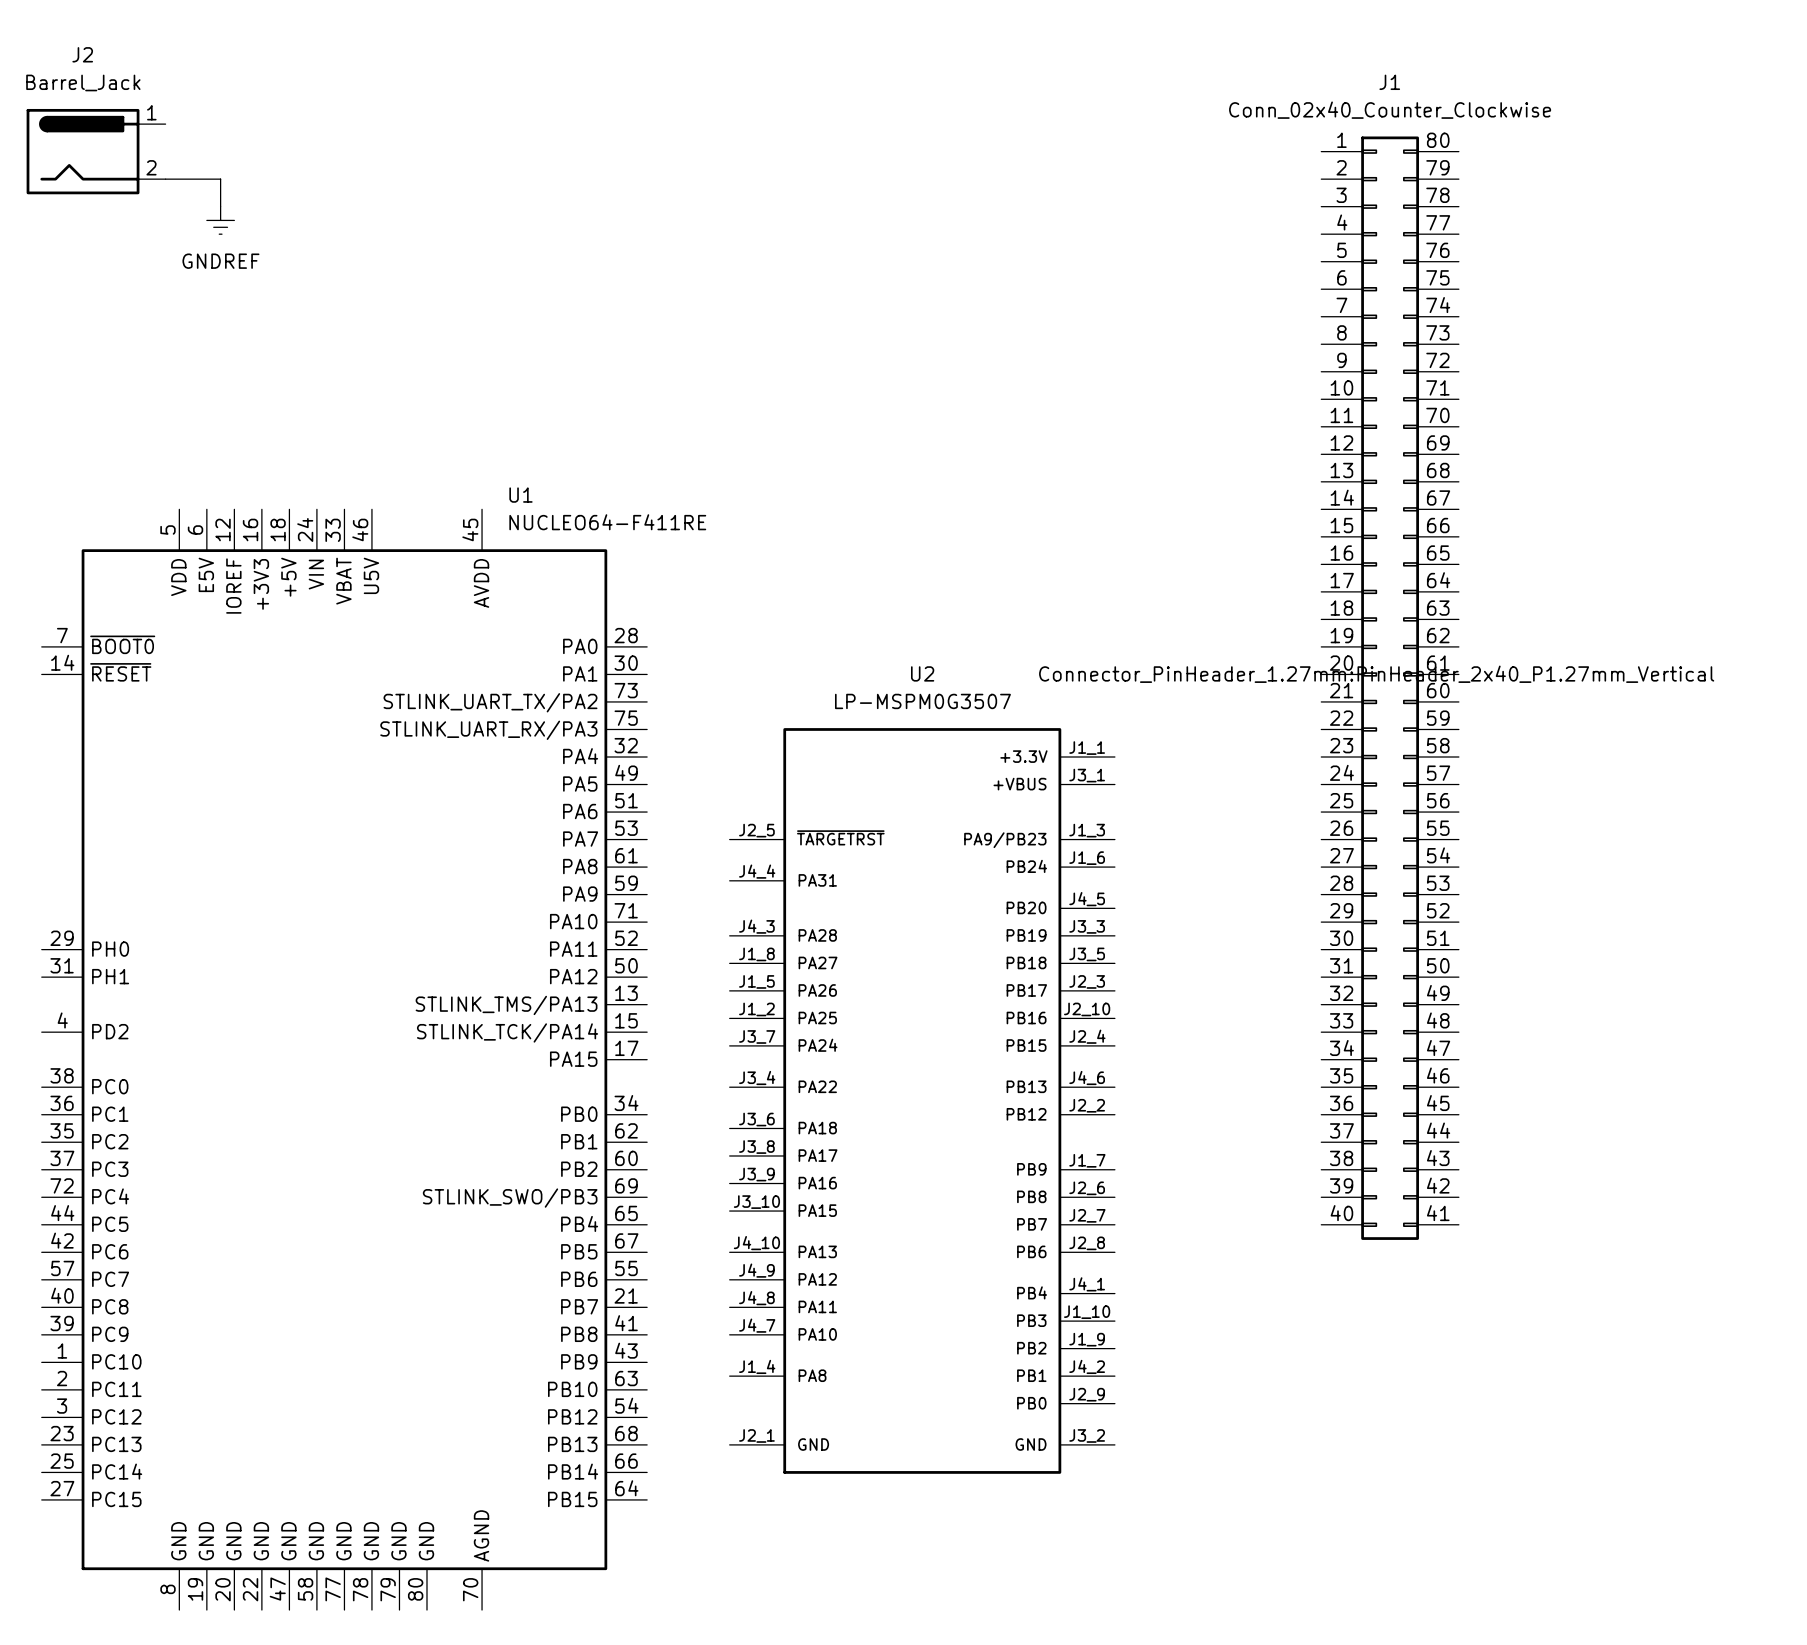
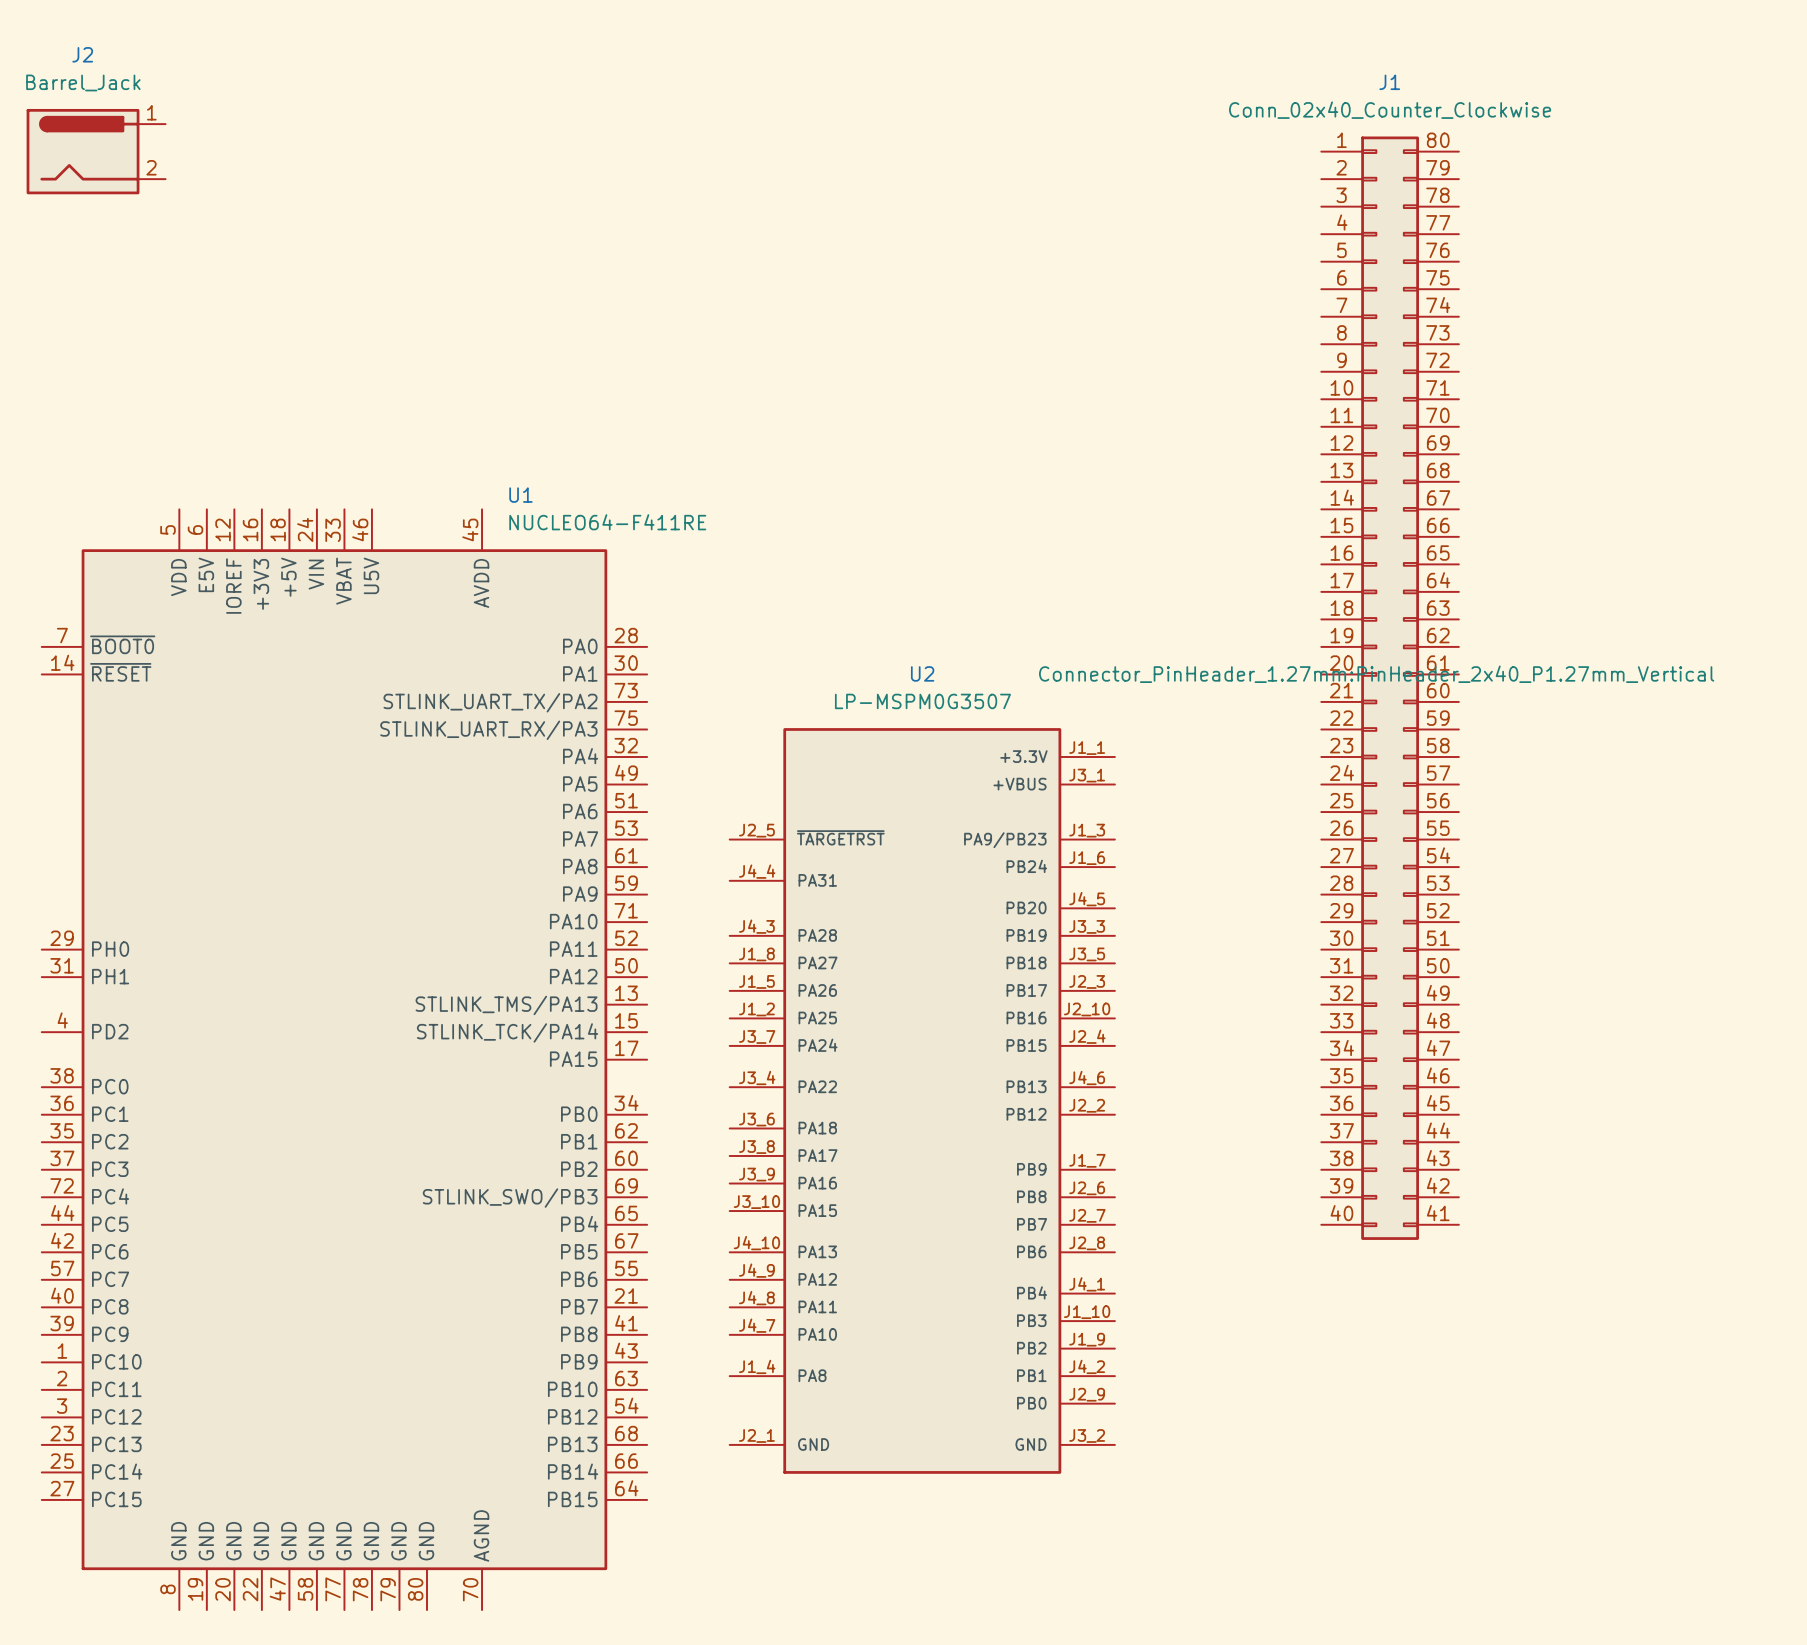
wire: (165, 179) (220, 179) (220, 206) -> none
power symbol: GNDREF (220, 220) -> none

